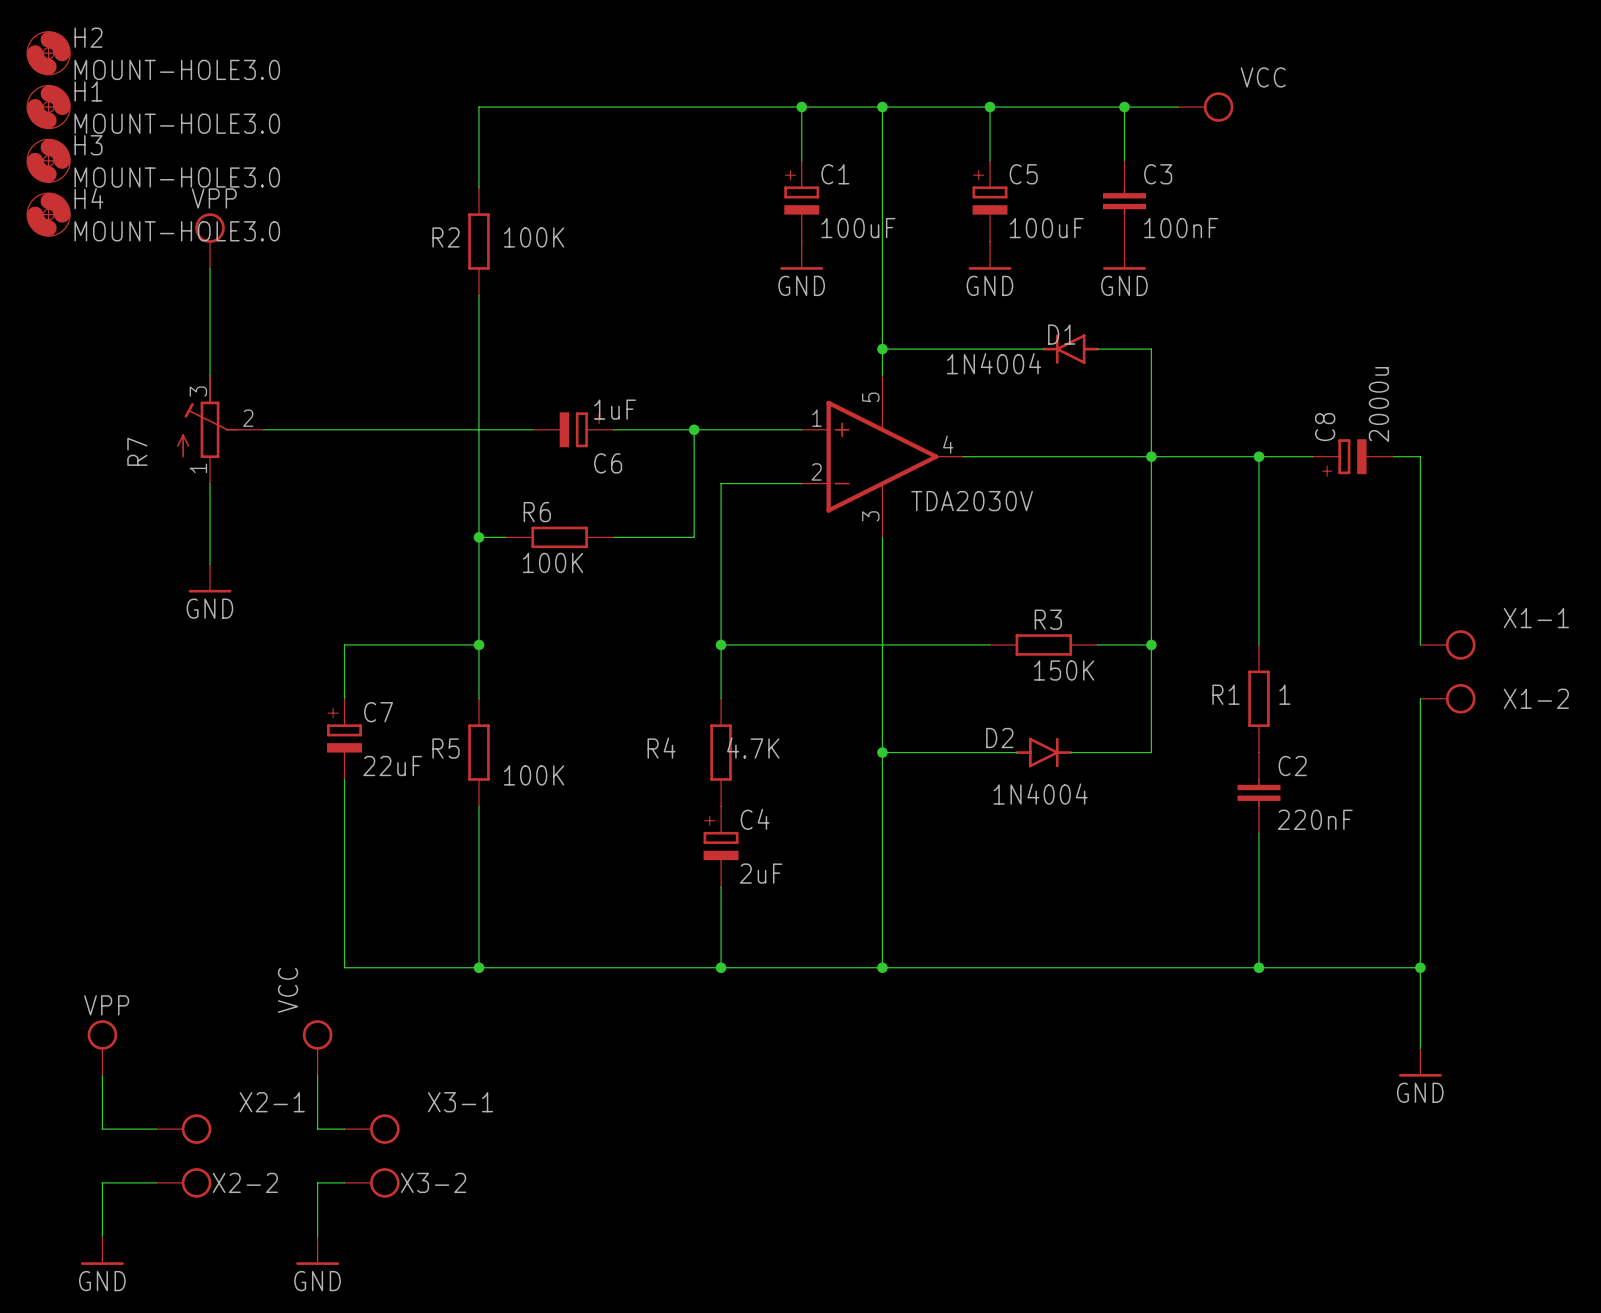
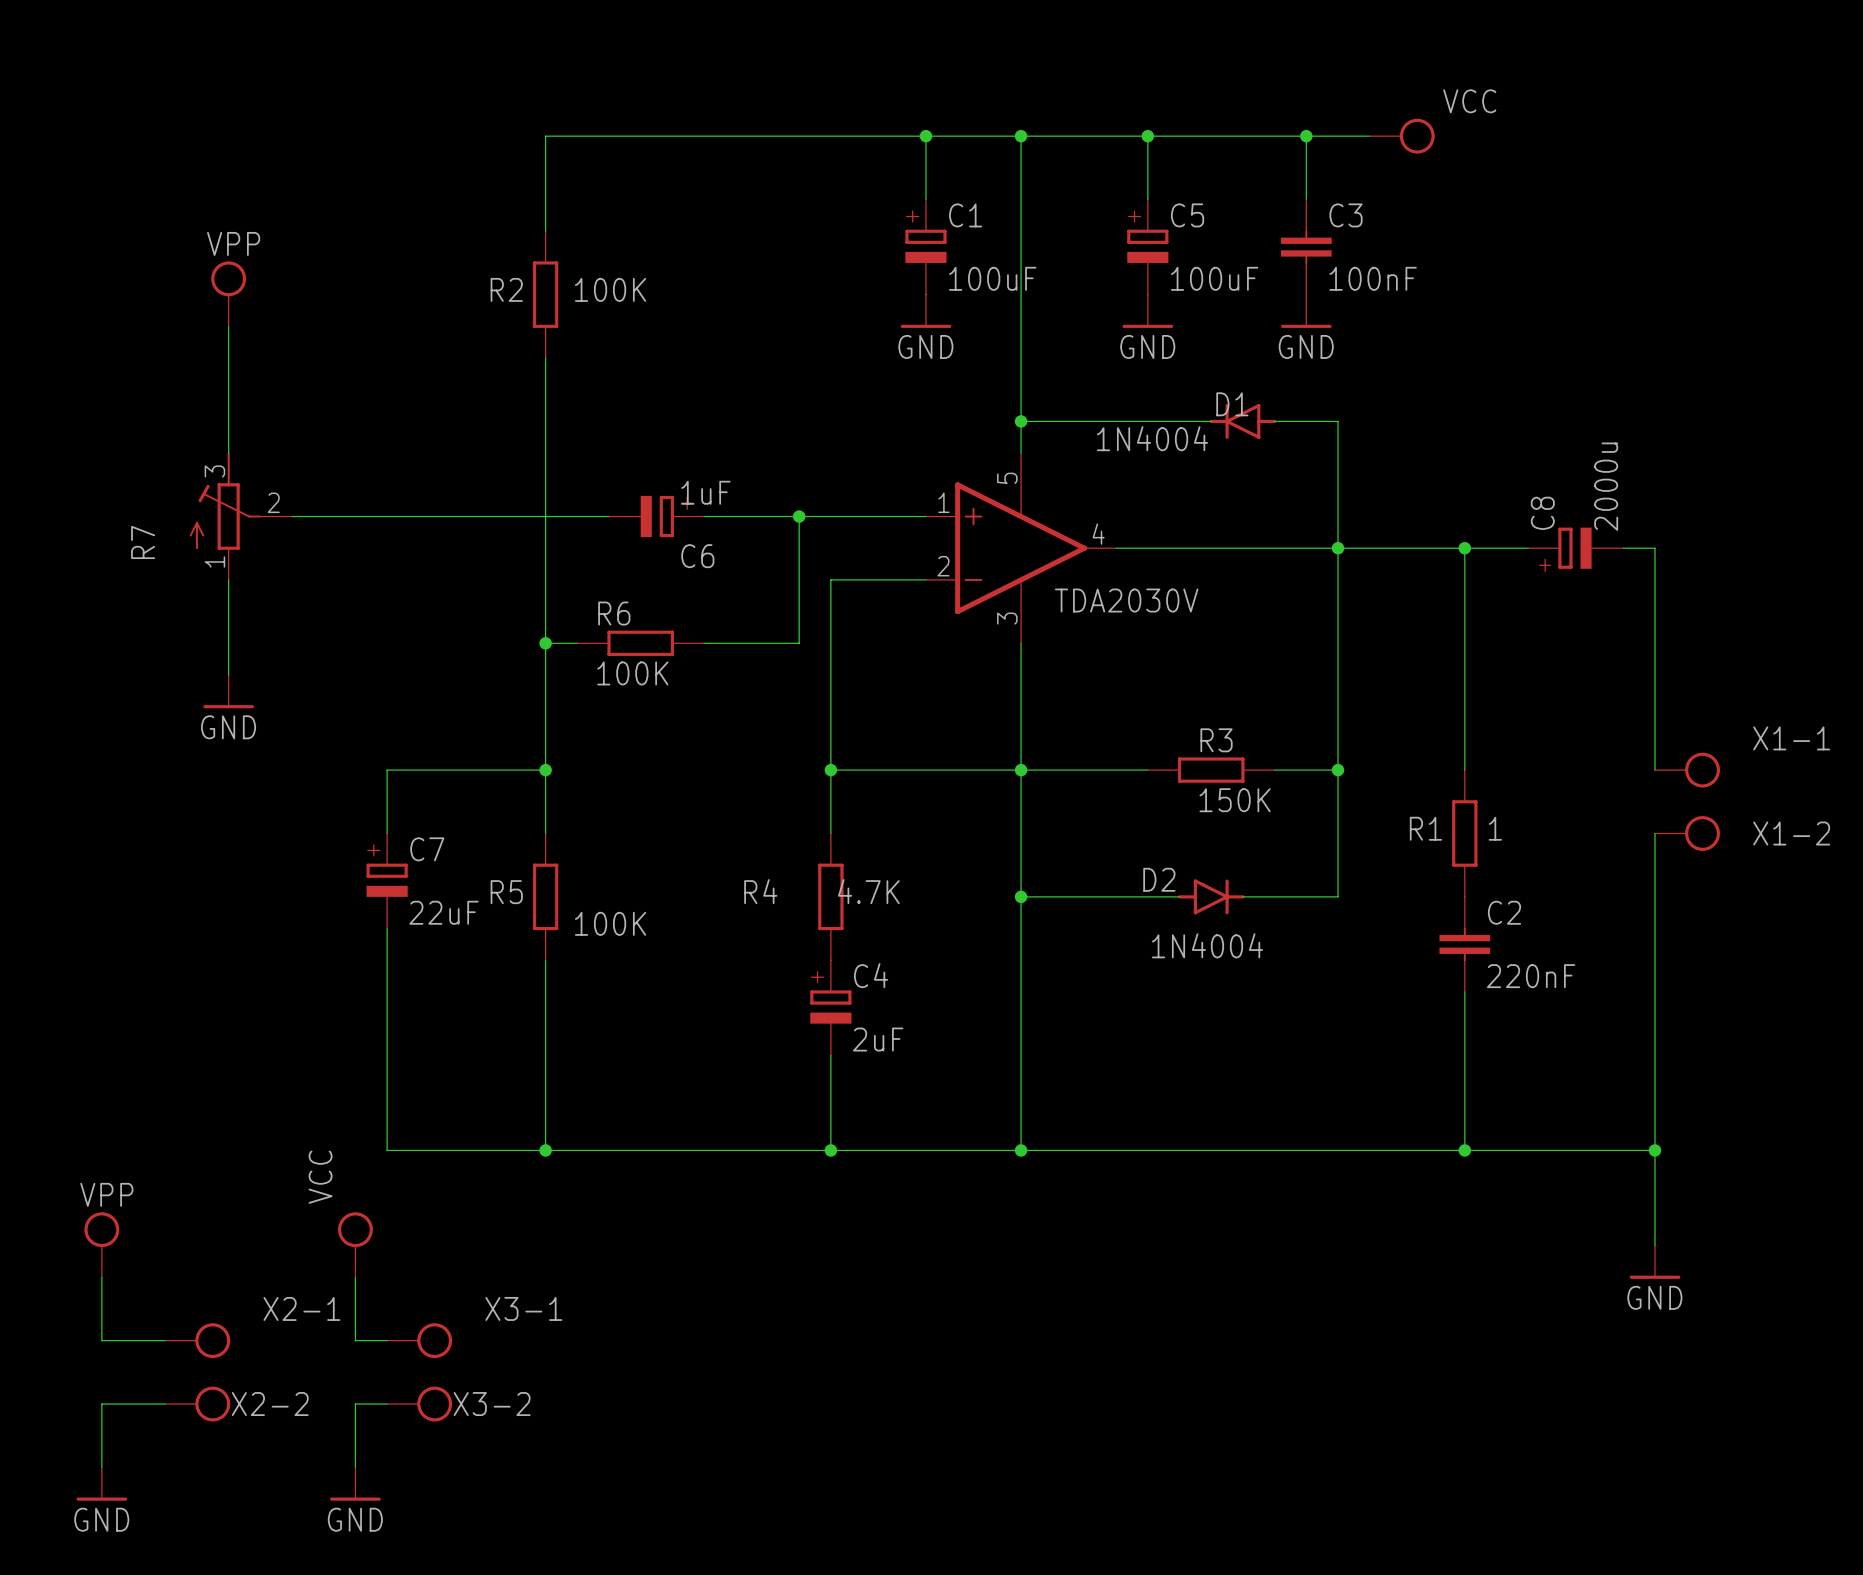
H2: MOUNT-HOLE3.0 (48, 53) -> none
H1: MOUNT-HOLE3.0 (48, 107) -> none
H3: MOUNT-HOLE3.0 (48, 160) -> none
H4: MOUNT-HOLE3.0 (48, 214) -> none
junction: none -> (1021, 770)

